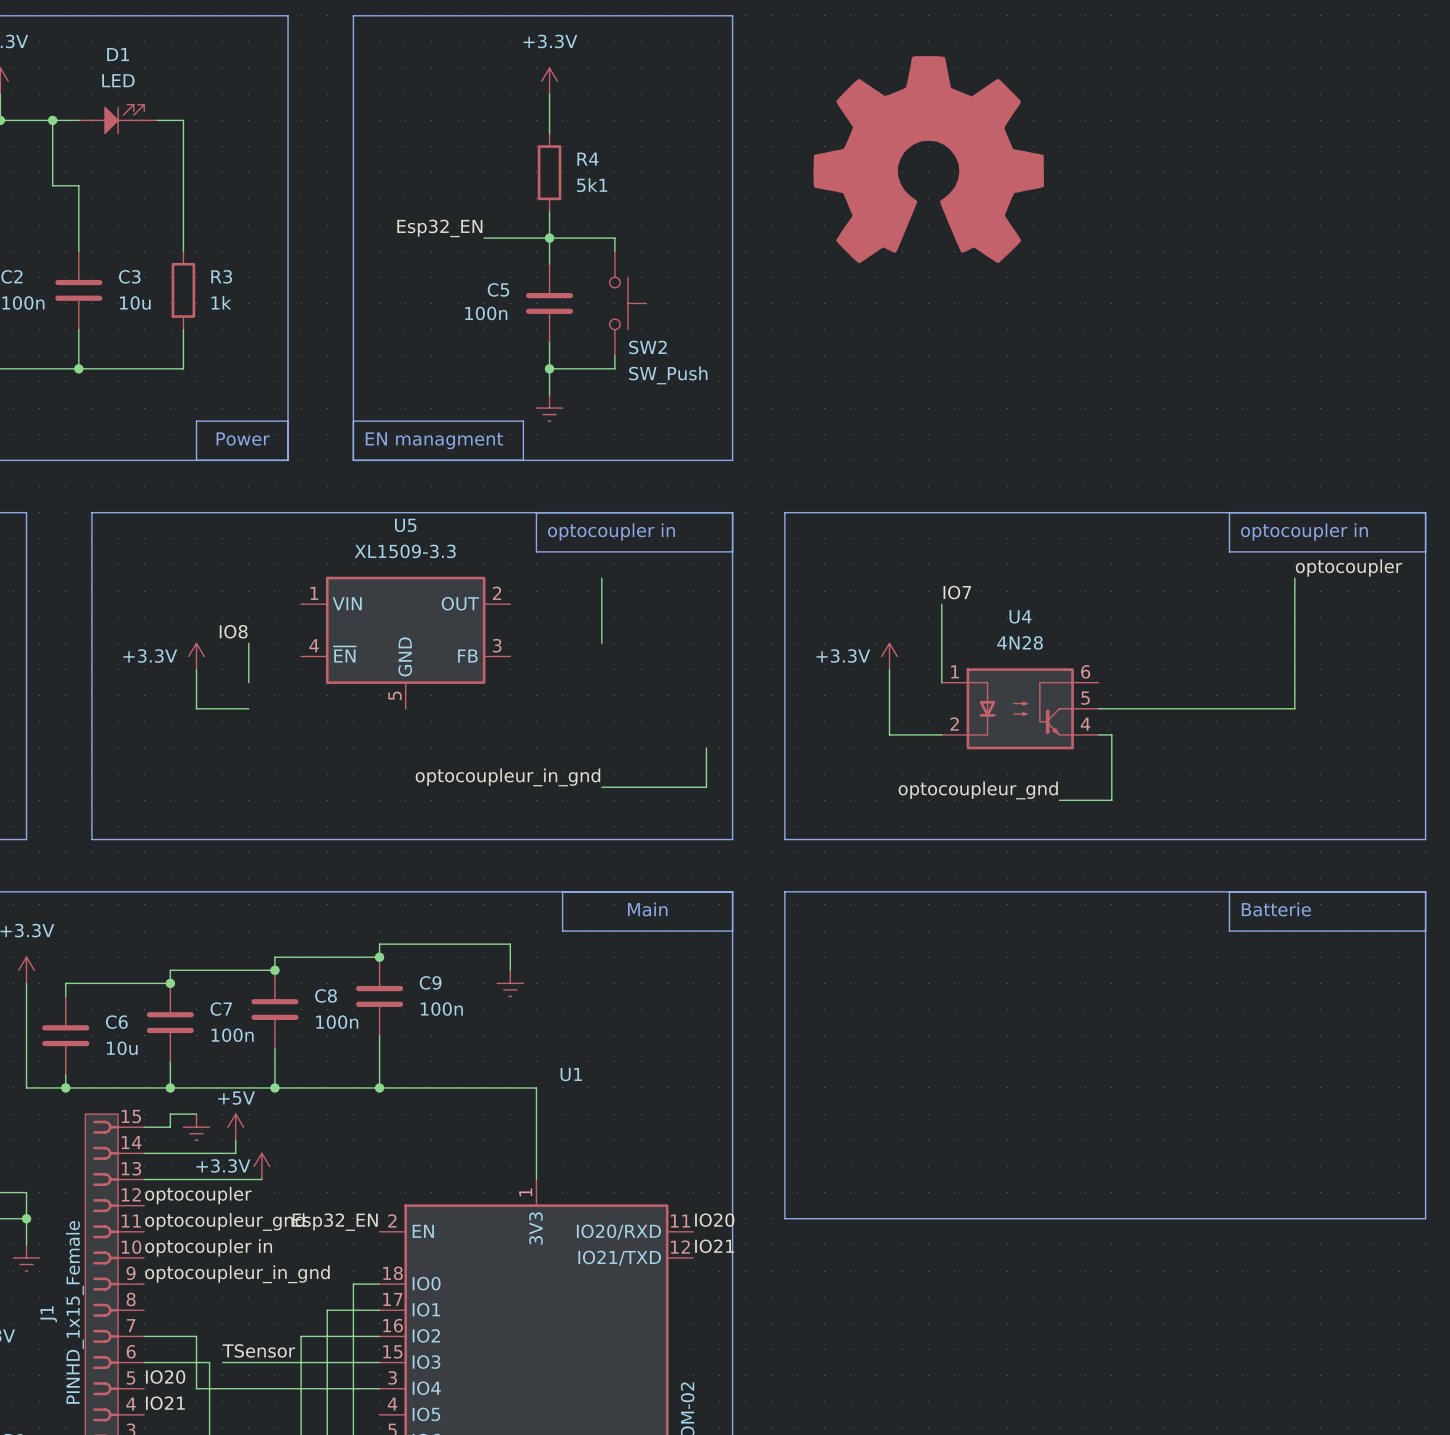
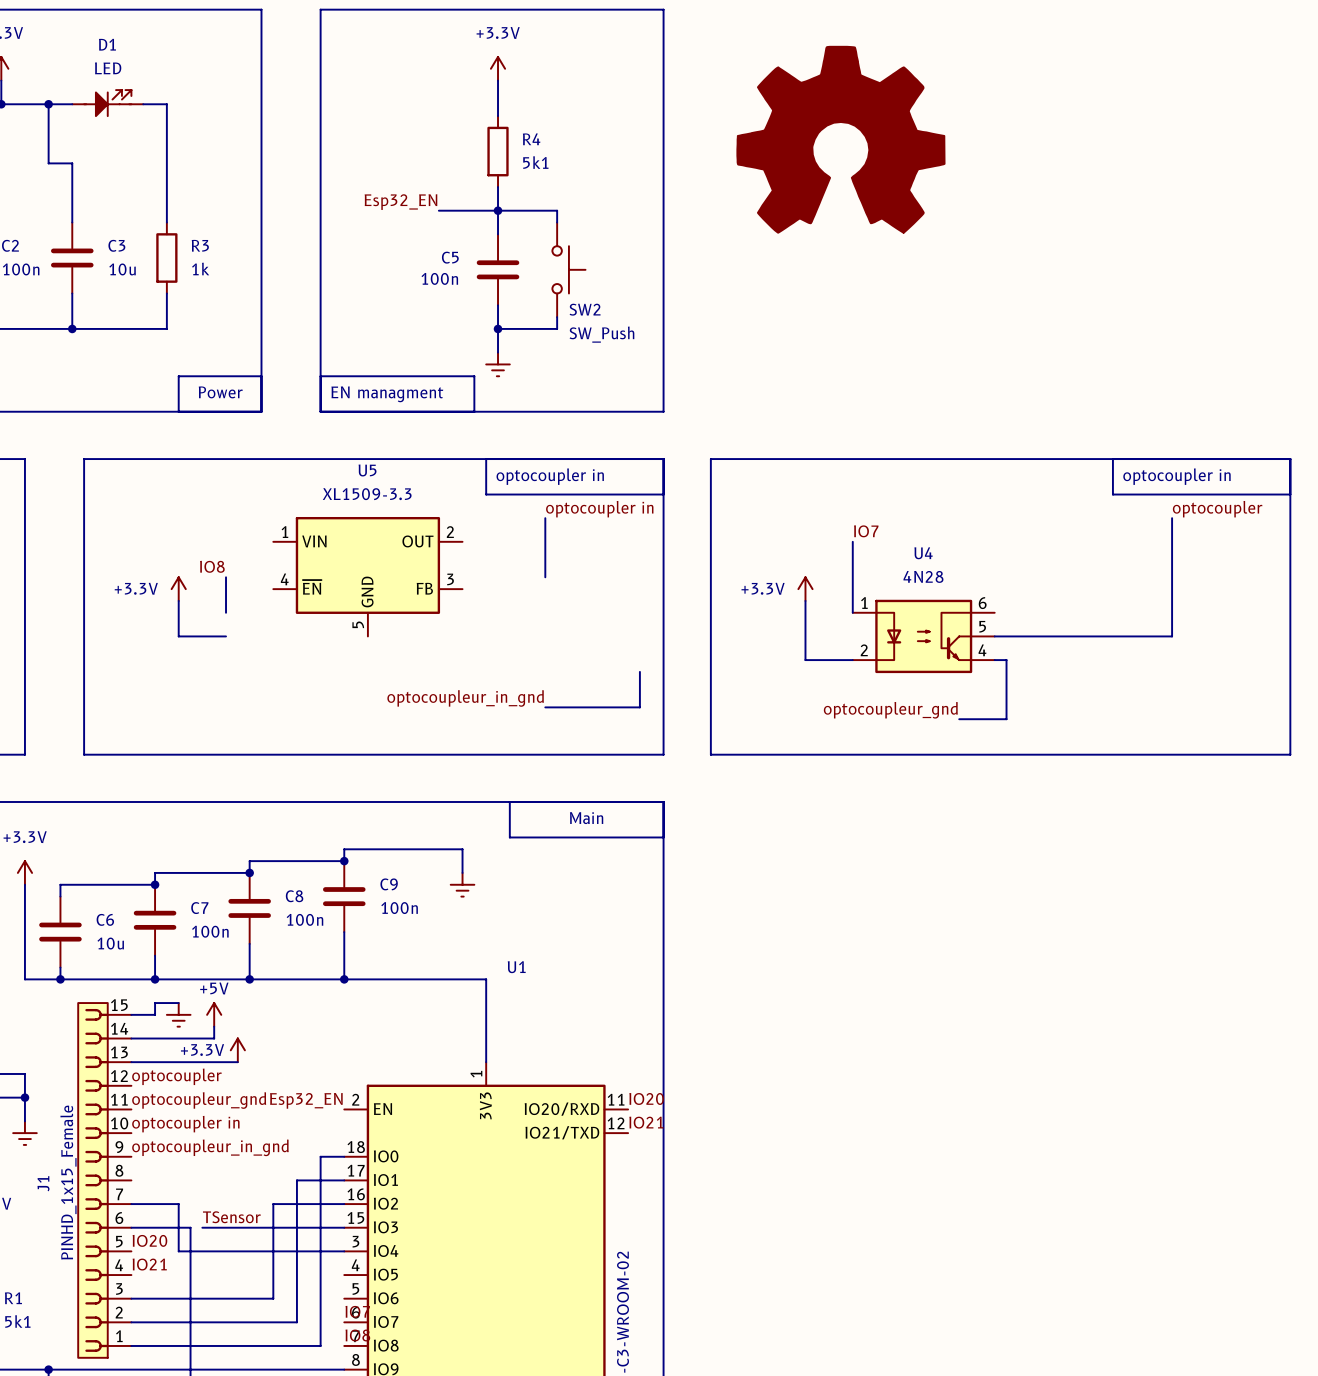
label: none -> optocoupler in (599, 509)
line: (784, 891) (1425, 891) (1425, 1218) (784, 1218) (784, 891) -> none
line: (1229, 891) (1229, 931) (1425, 931) -> none
text: Batterie (1276, 909) -> none

